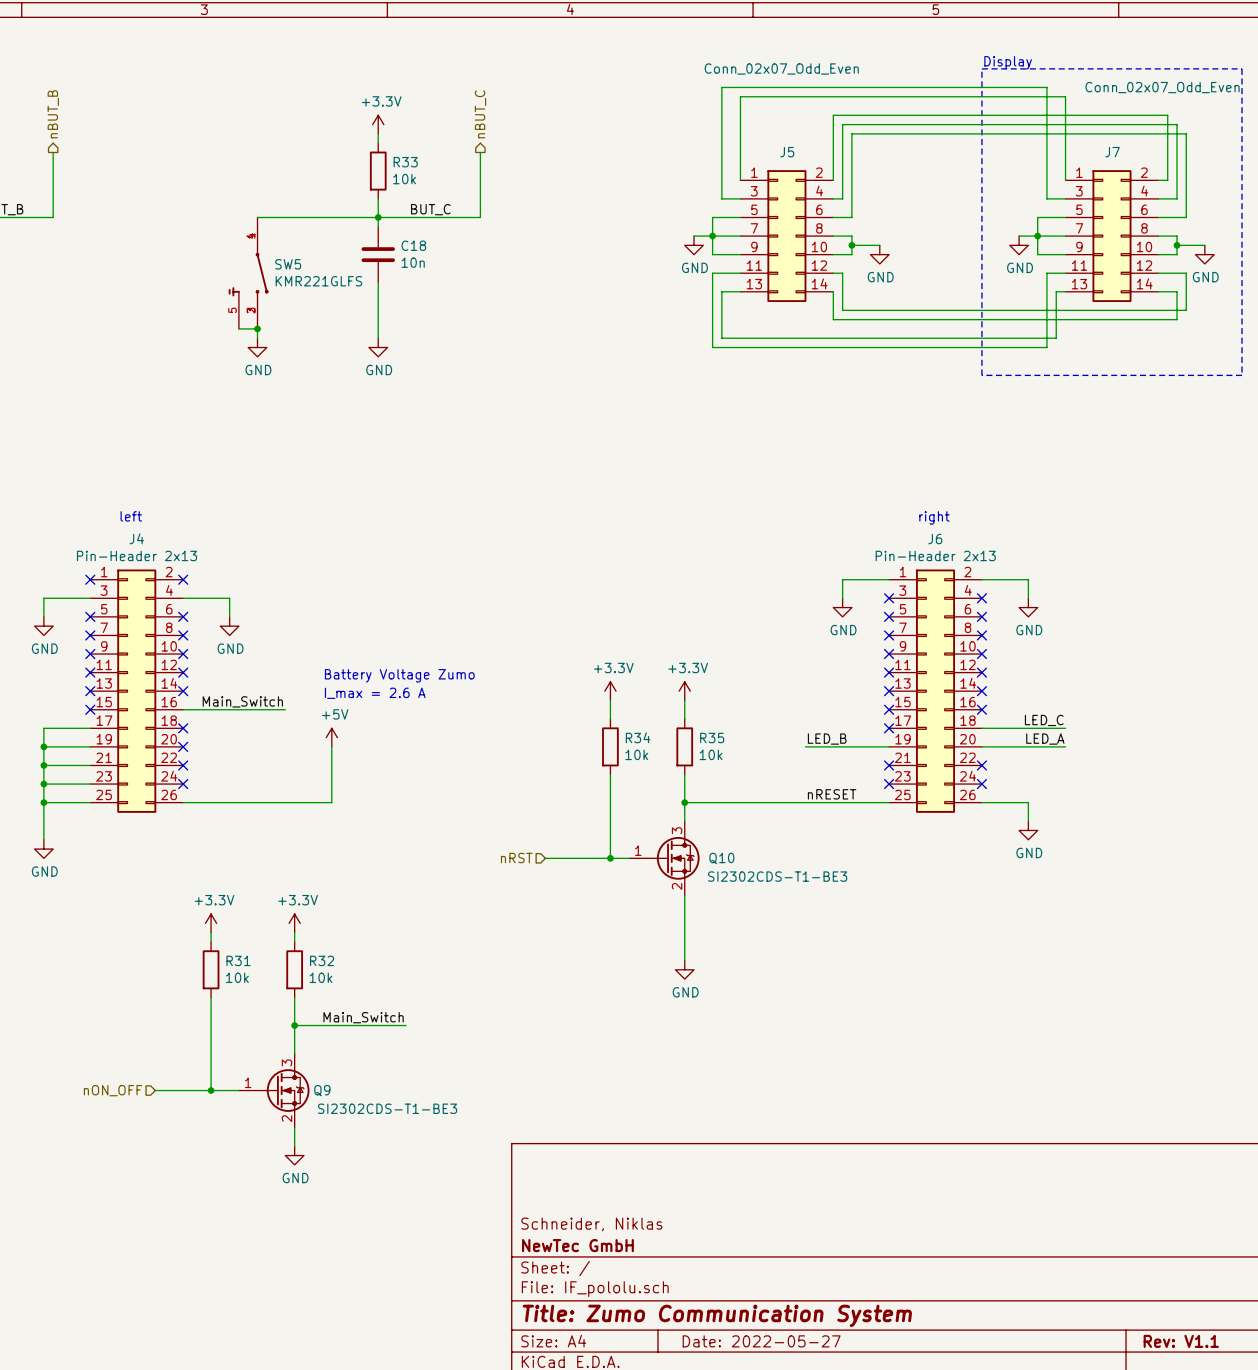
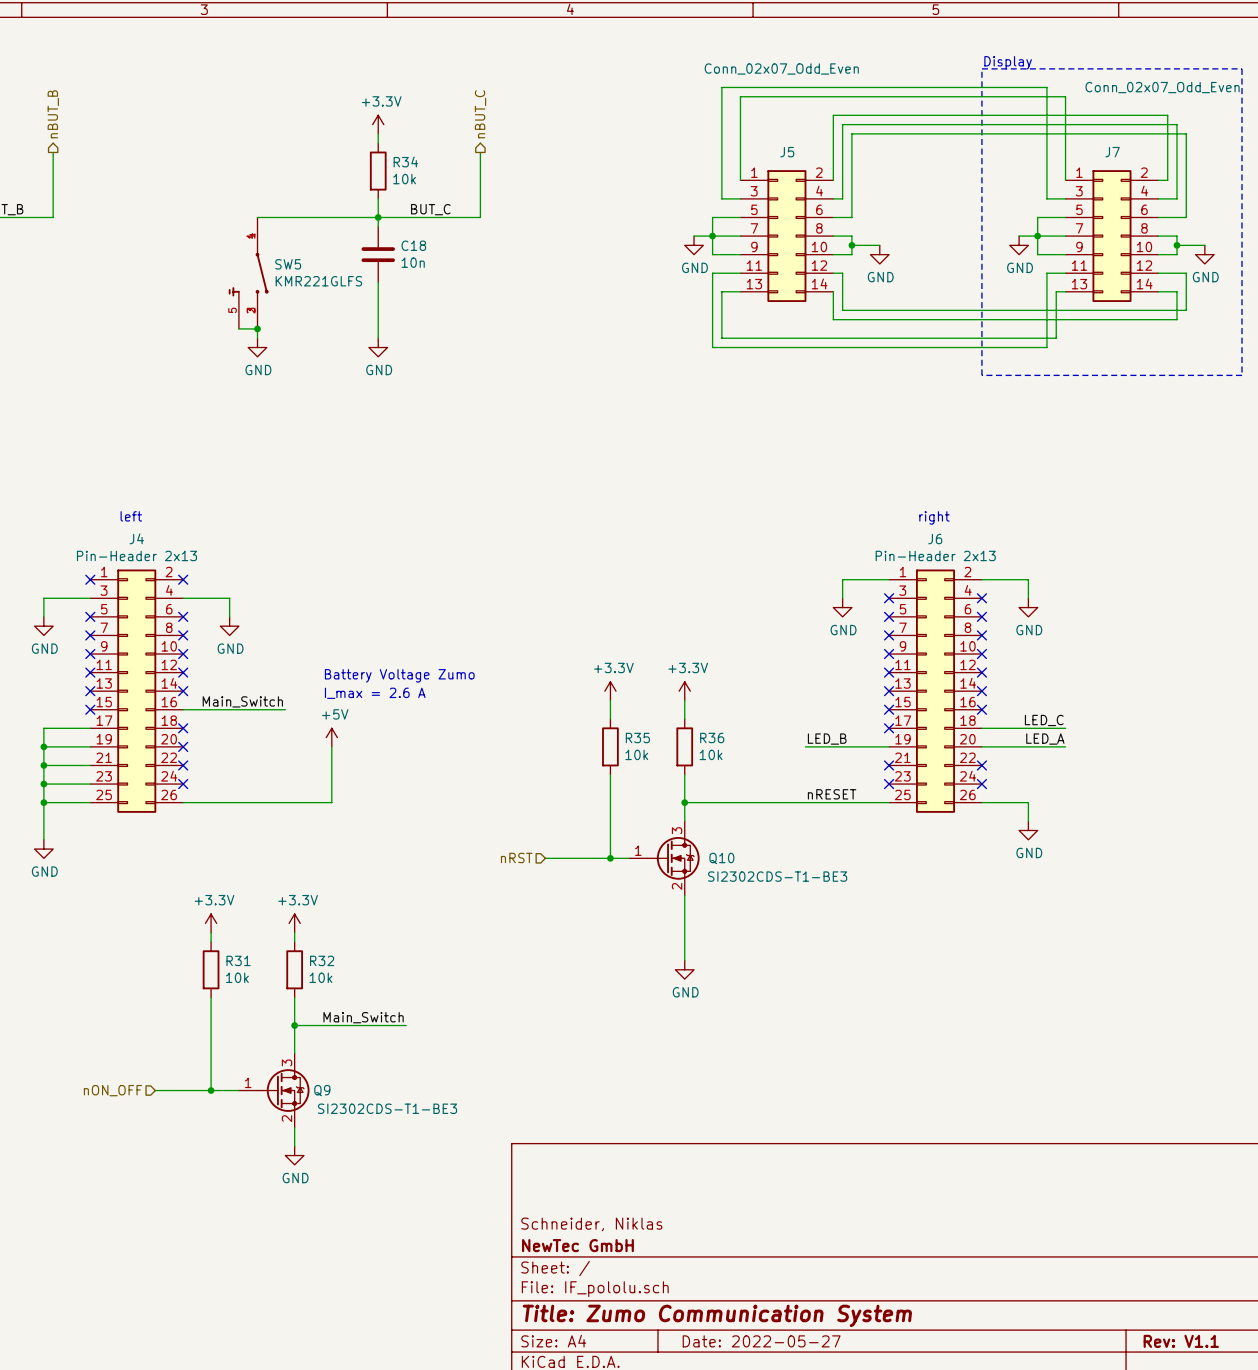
R33 name: R33 (405, 162) -> R34 (405, 161)
R34 name: R34 (638, 737) -> R35 (637, 738)
R35 name: R35 (712, 738) -> R36 (712, 738)

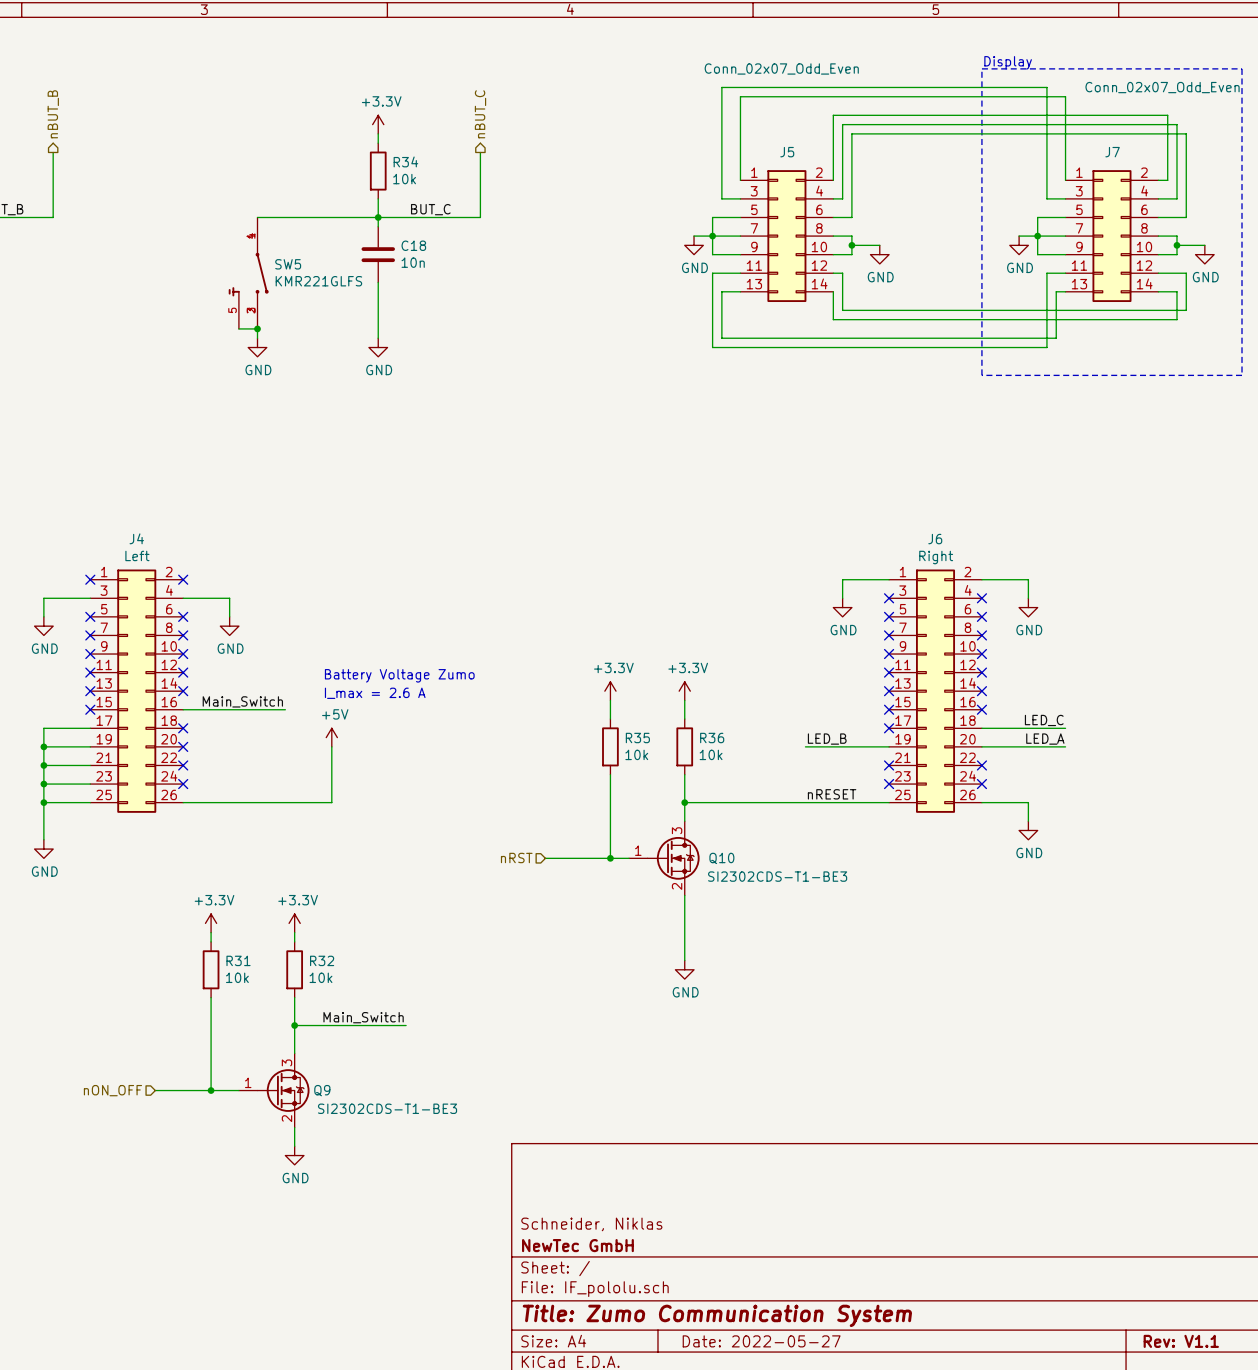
text: left (131, 516) -> none
text: right (934, 517) -> none
J4 value: Pin-Header 2x13 (136, 555) -> Left (137, 555)
J6 value: Pin-Header 2x13 (935, 555) -> Right (936, 557)

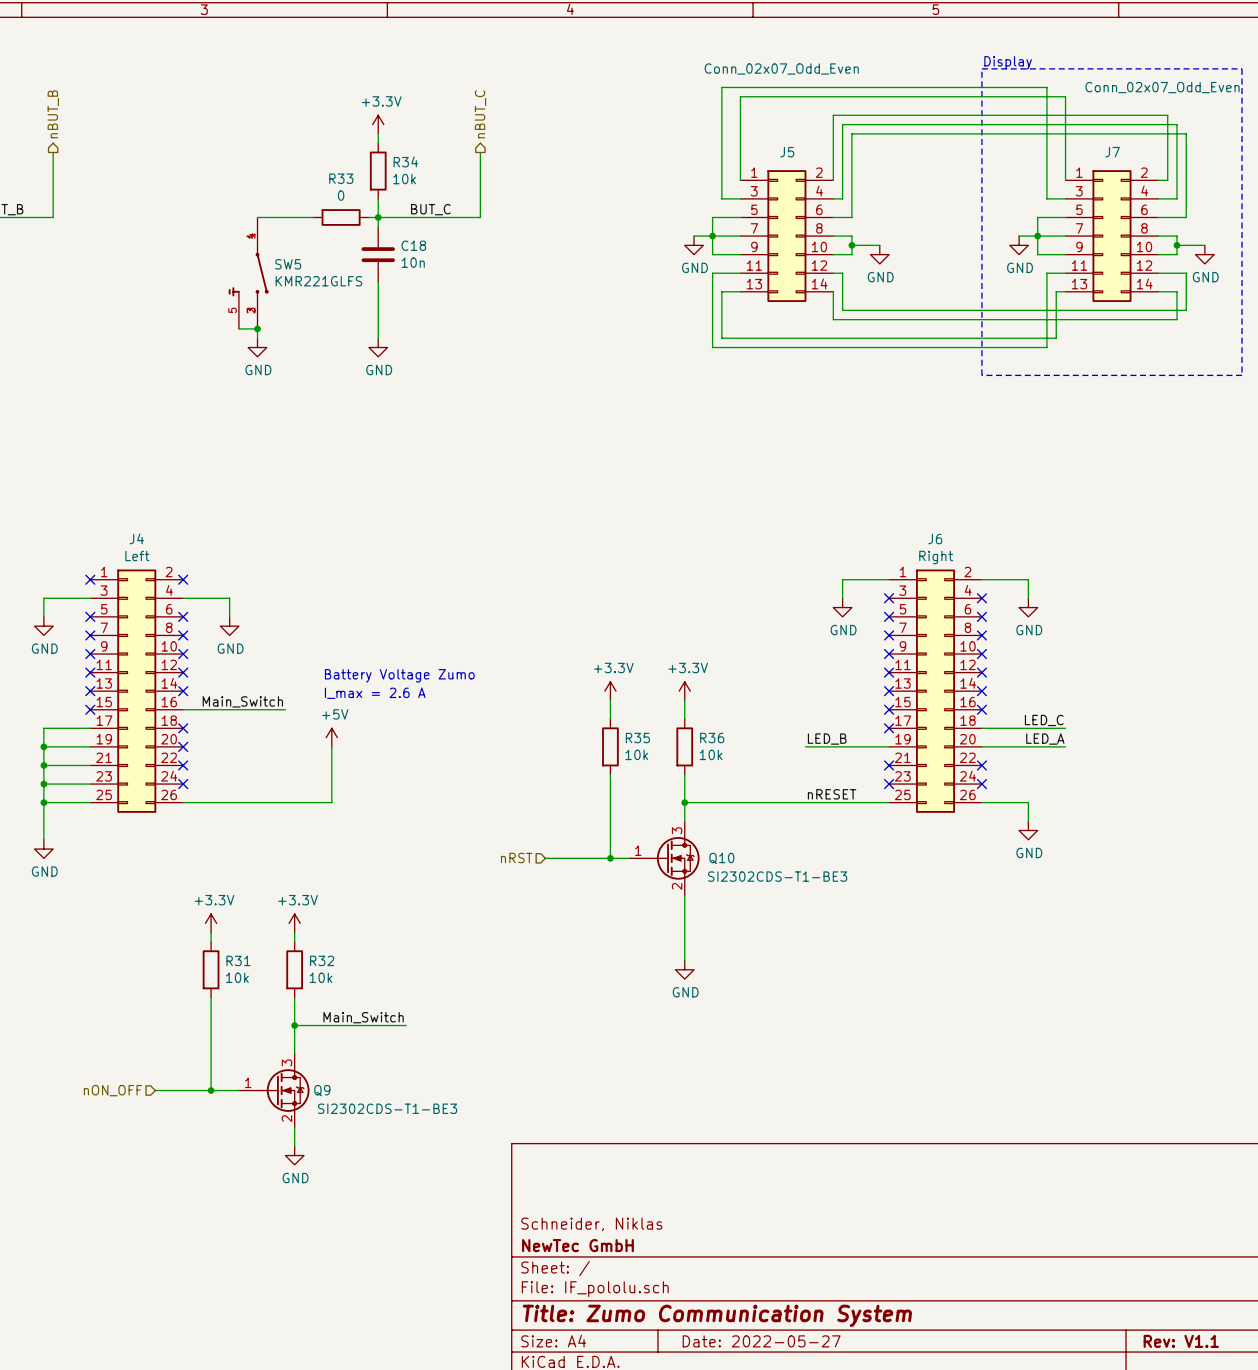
wire: (313, 217) (368, 217) -> none
R33: none -> 0 (341, 217)

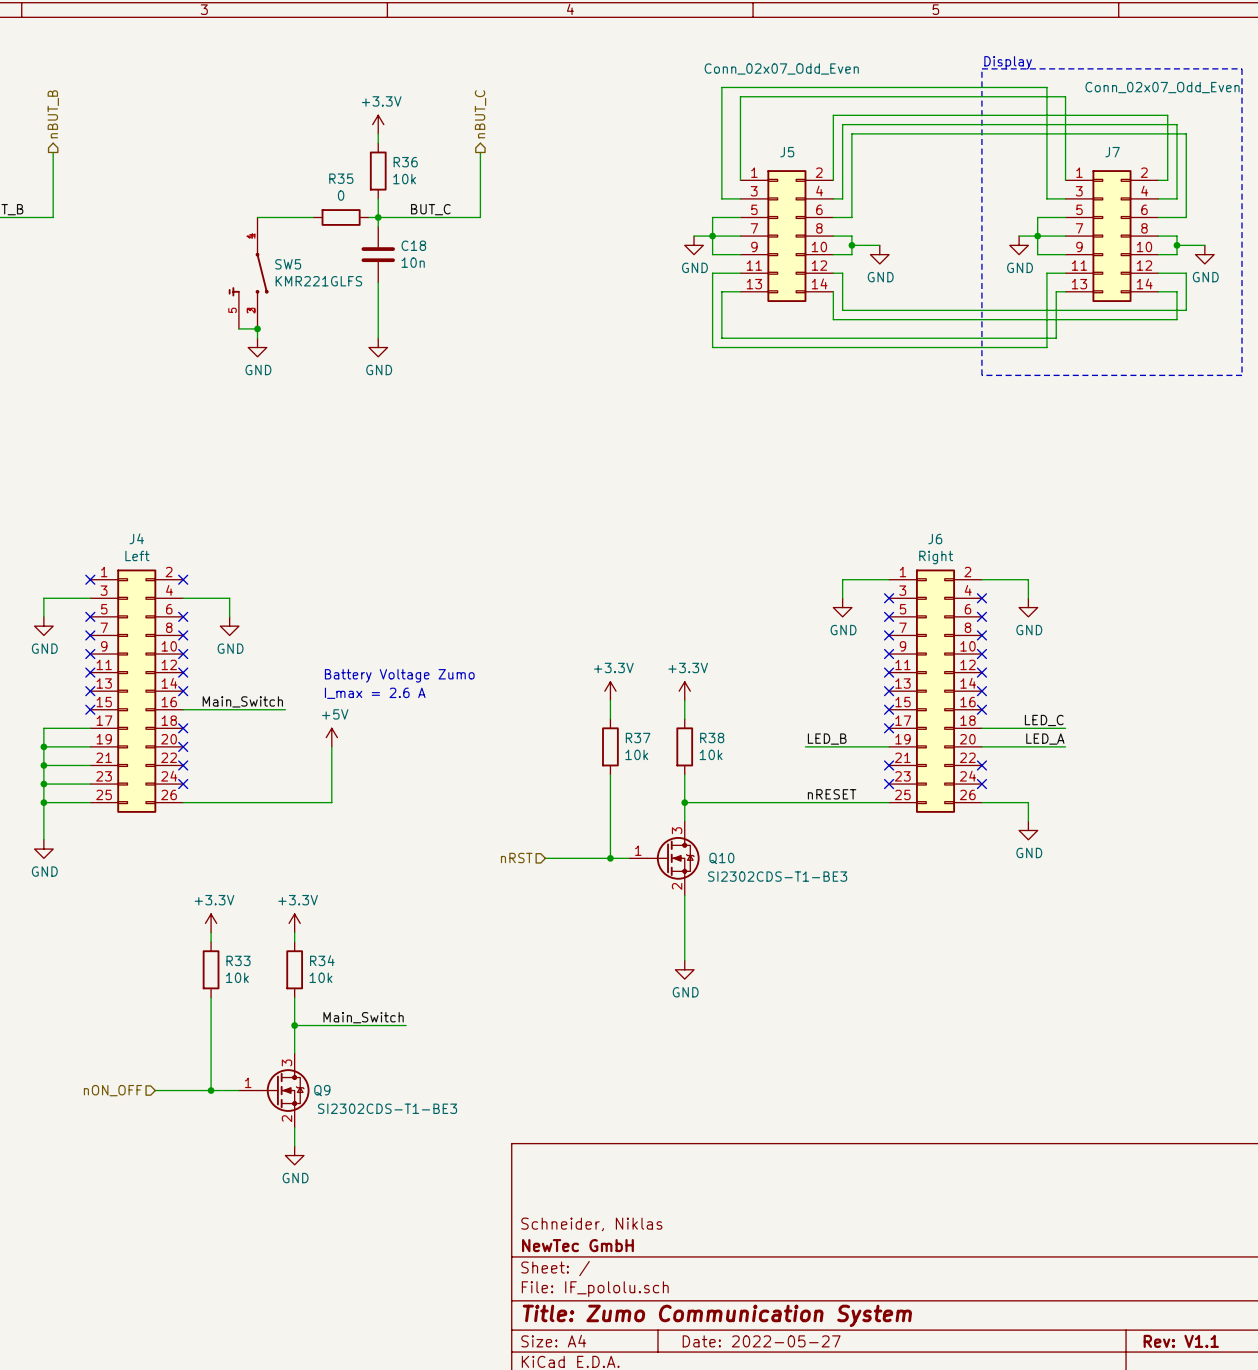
R34 name: R34 (405, 161) -> R36 (405, 162)
R33 name: R33 (341, 178) -> R35 (341, 178)
R35 name: R35 (637, 738) -> R37 (638, 738)
R36 name: R36 (712, 738) -> R38 (712, 738)
R31 name: R31 (238, 960) -> R33 (238, 960)
R32 name: R32 (322, 960) -> R34 (322, 960)

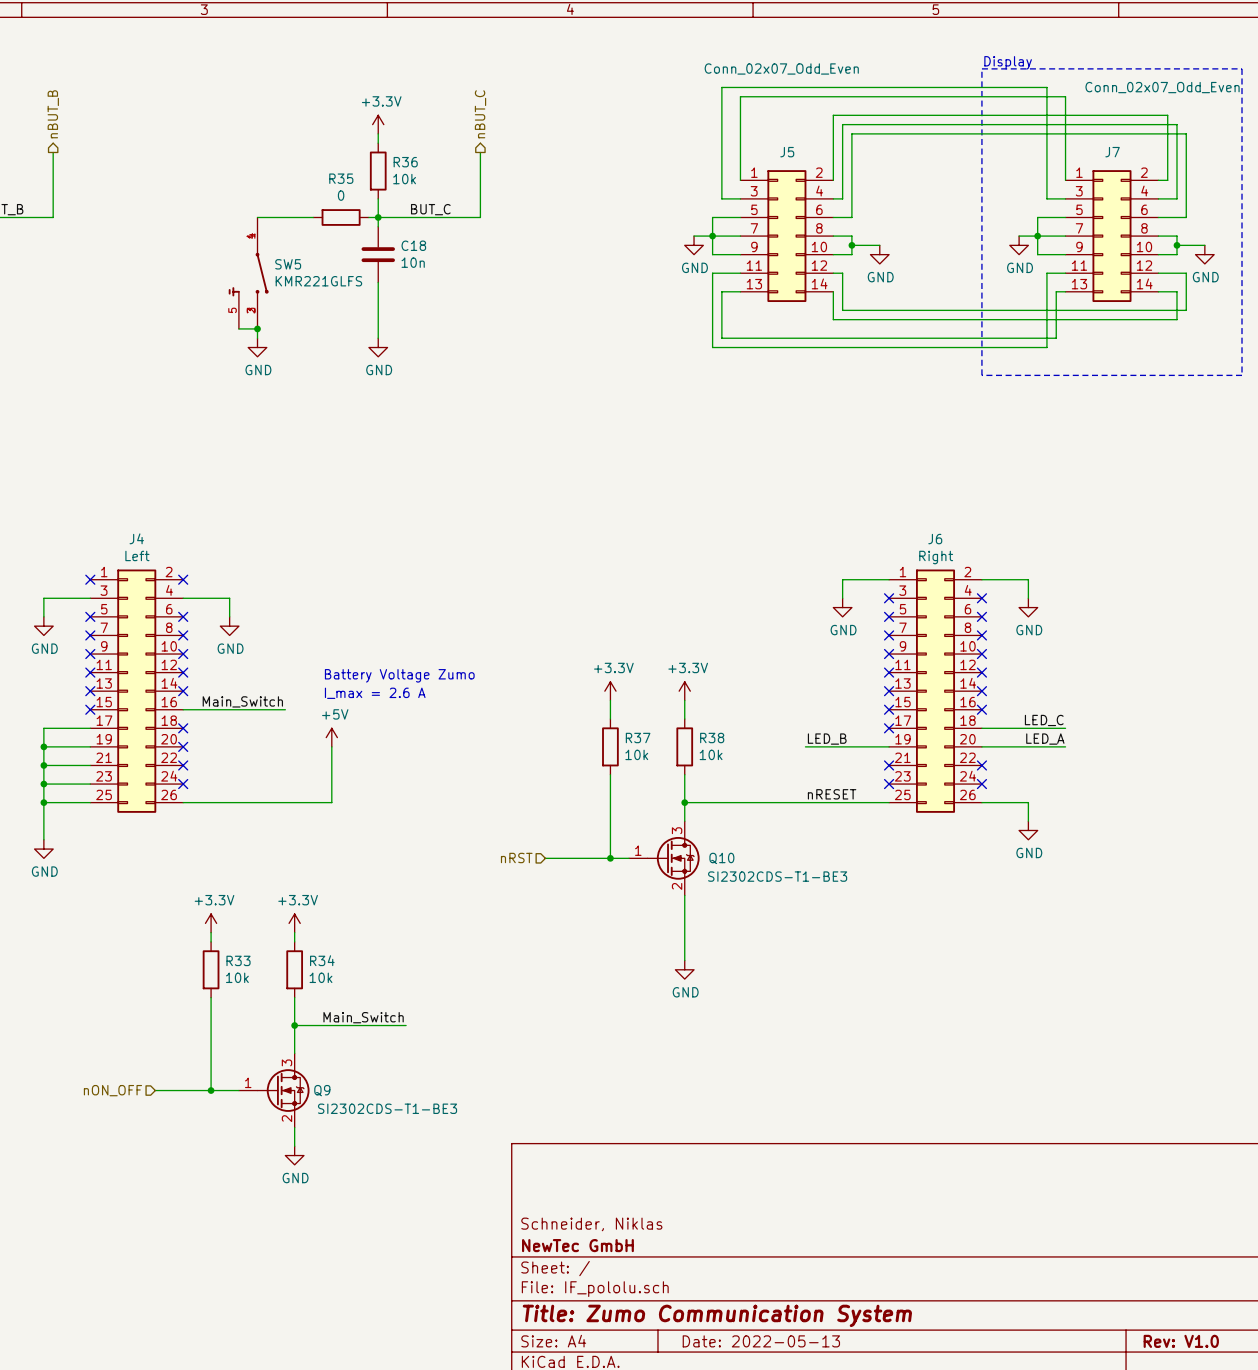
title block: Date: 2022-05-27 (761, 1341) -> Date: 2022-05-13 (761, 1341)
title block: Rev: V1.1 (1181, 1341) -> Rev: V1.0 (1181, 1341)

